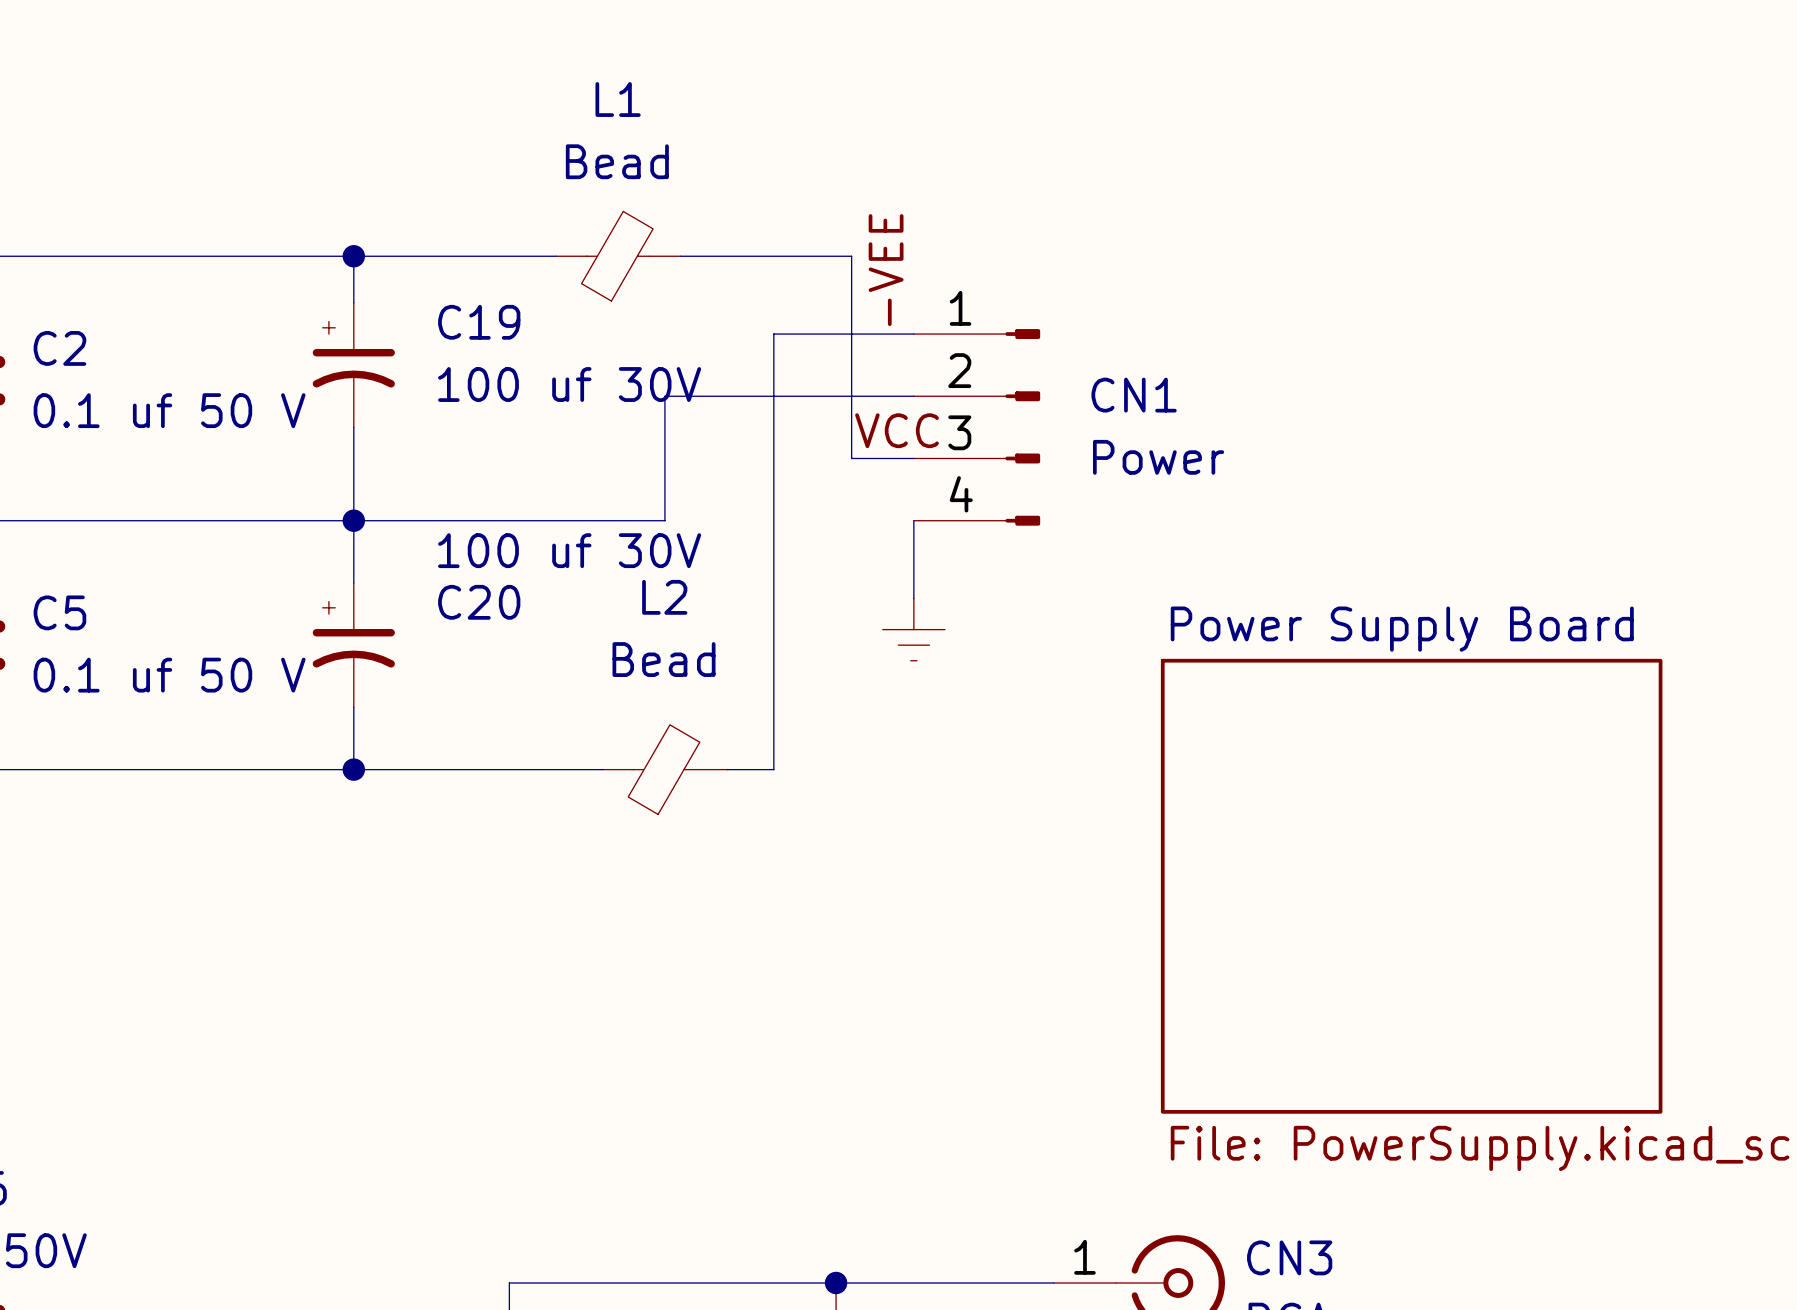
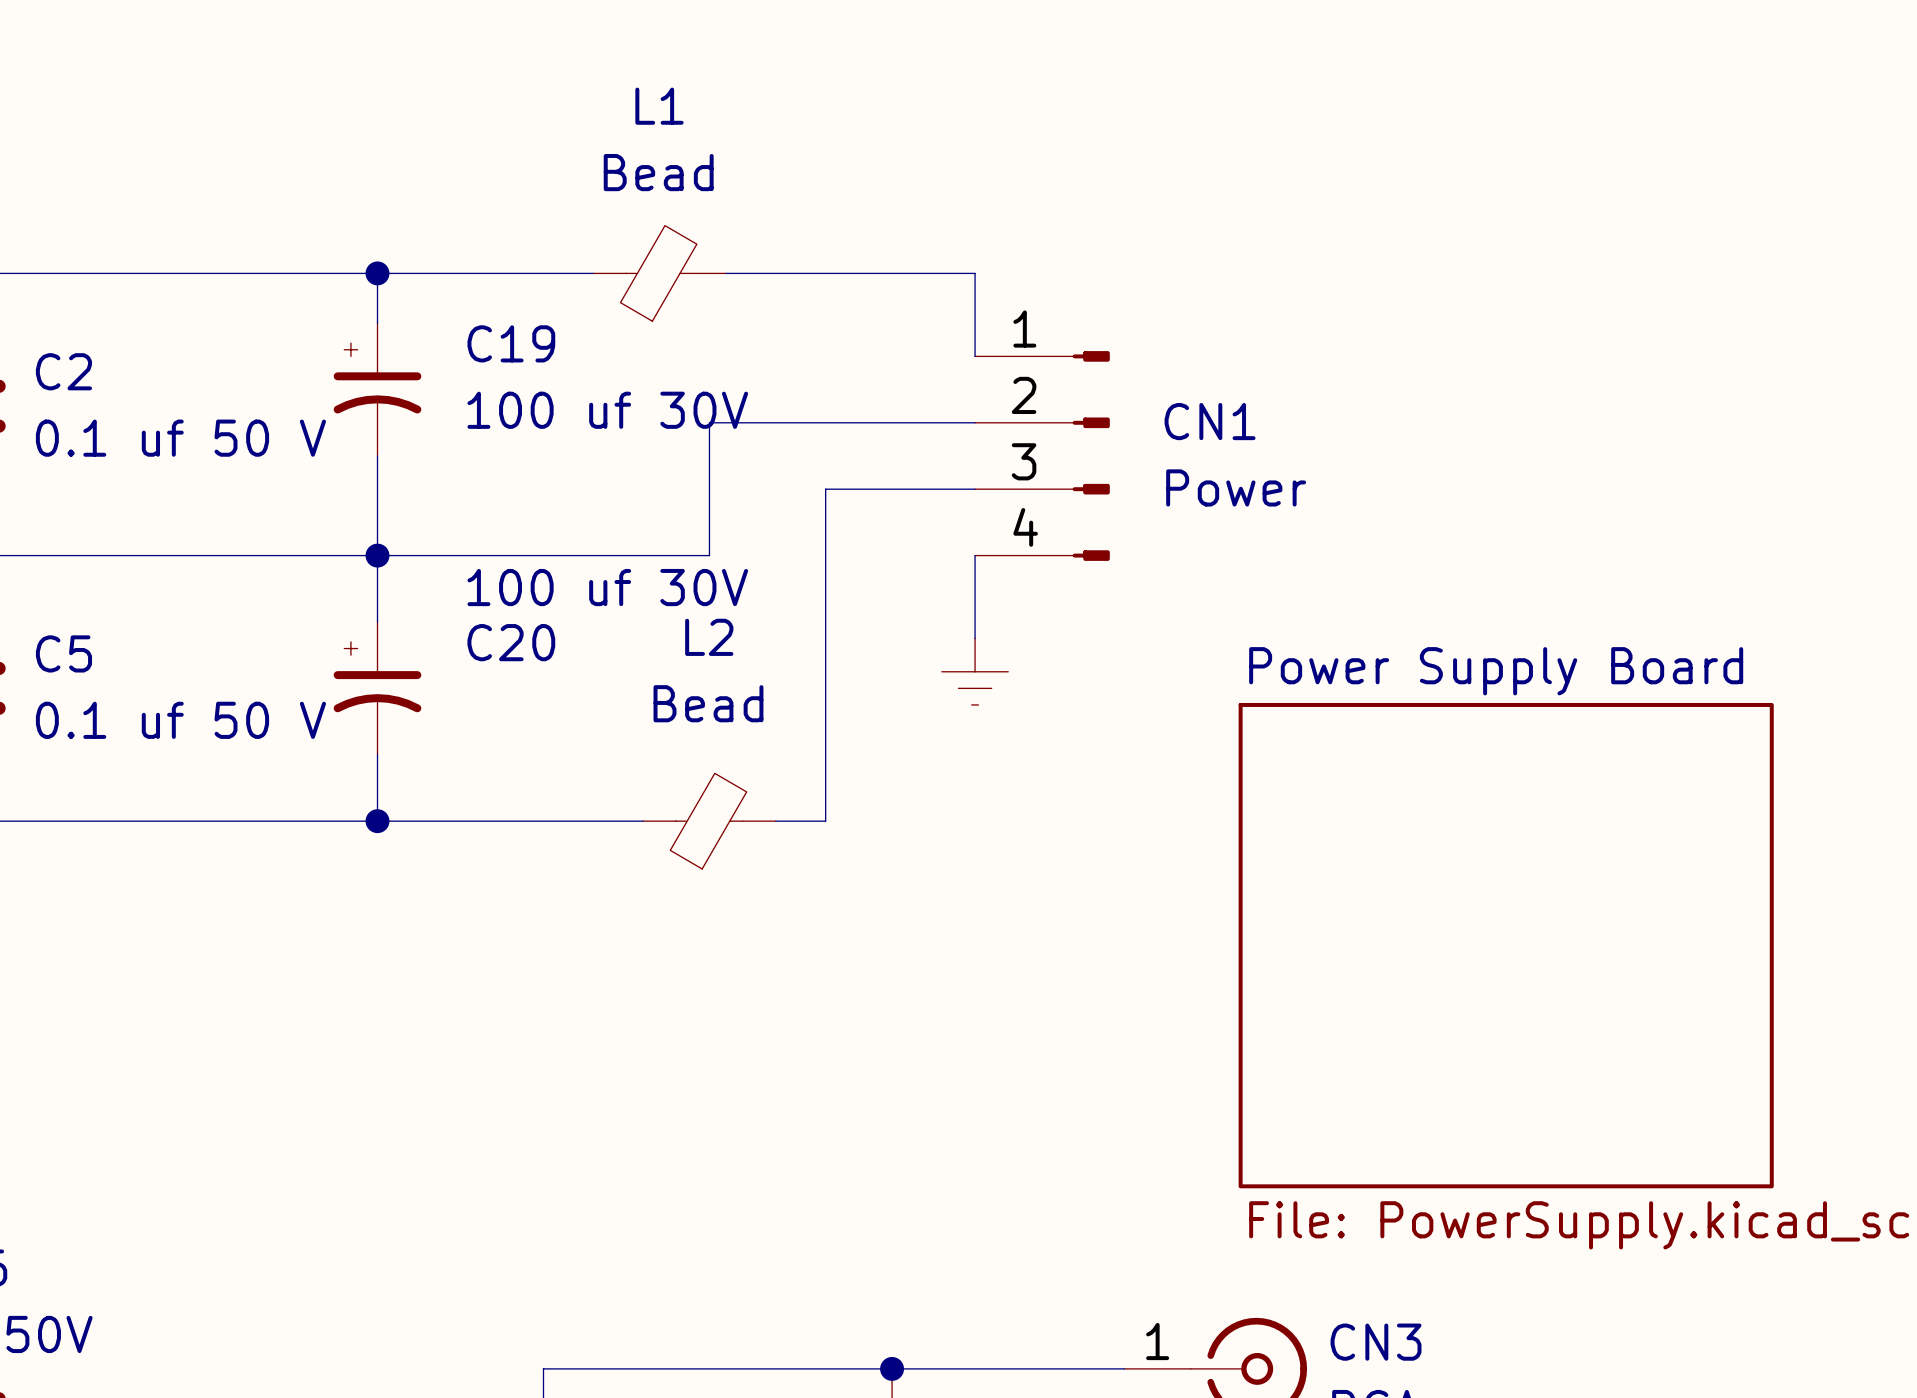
wire: (851, 256) (851, 458) -> (908, 273) (975, 273) (975, 356)
label: -VEE (886, 270) -> none
wire: (913, 334) (773, 334) (773, 458) -> (908, 489) (825, 489)
label: VCC (897, 430) -> none

